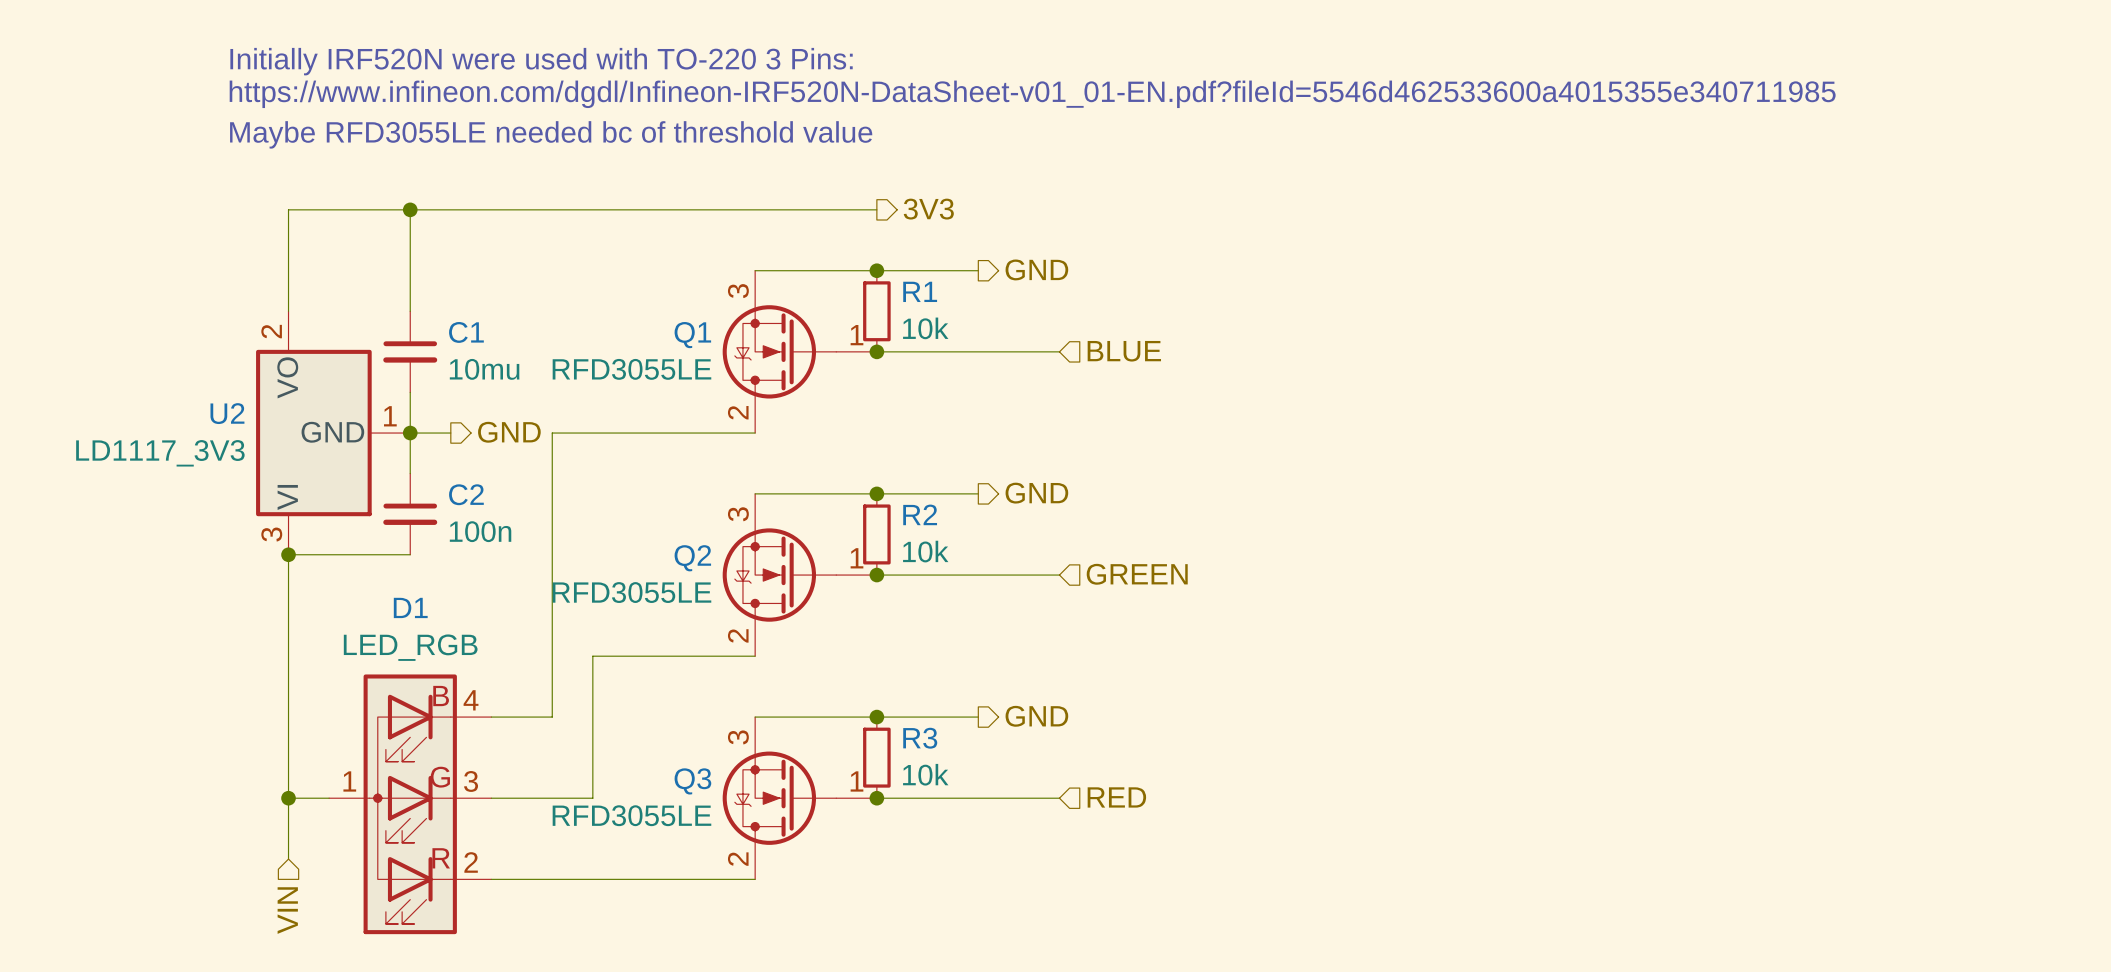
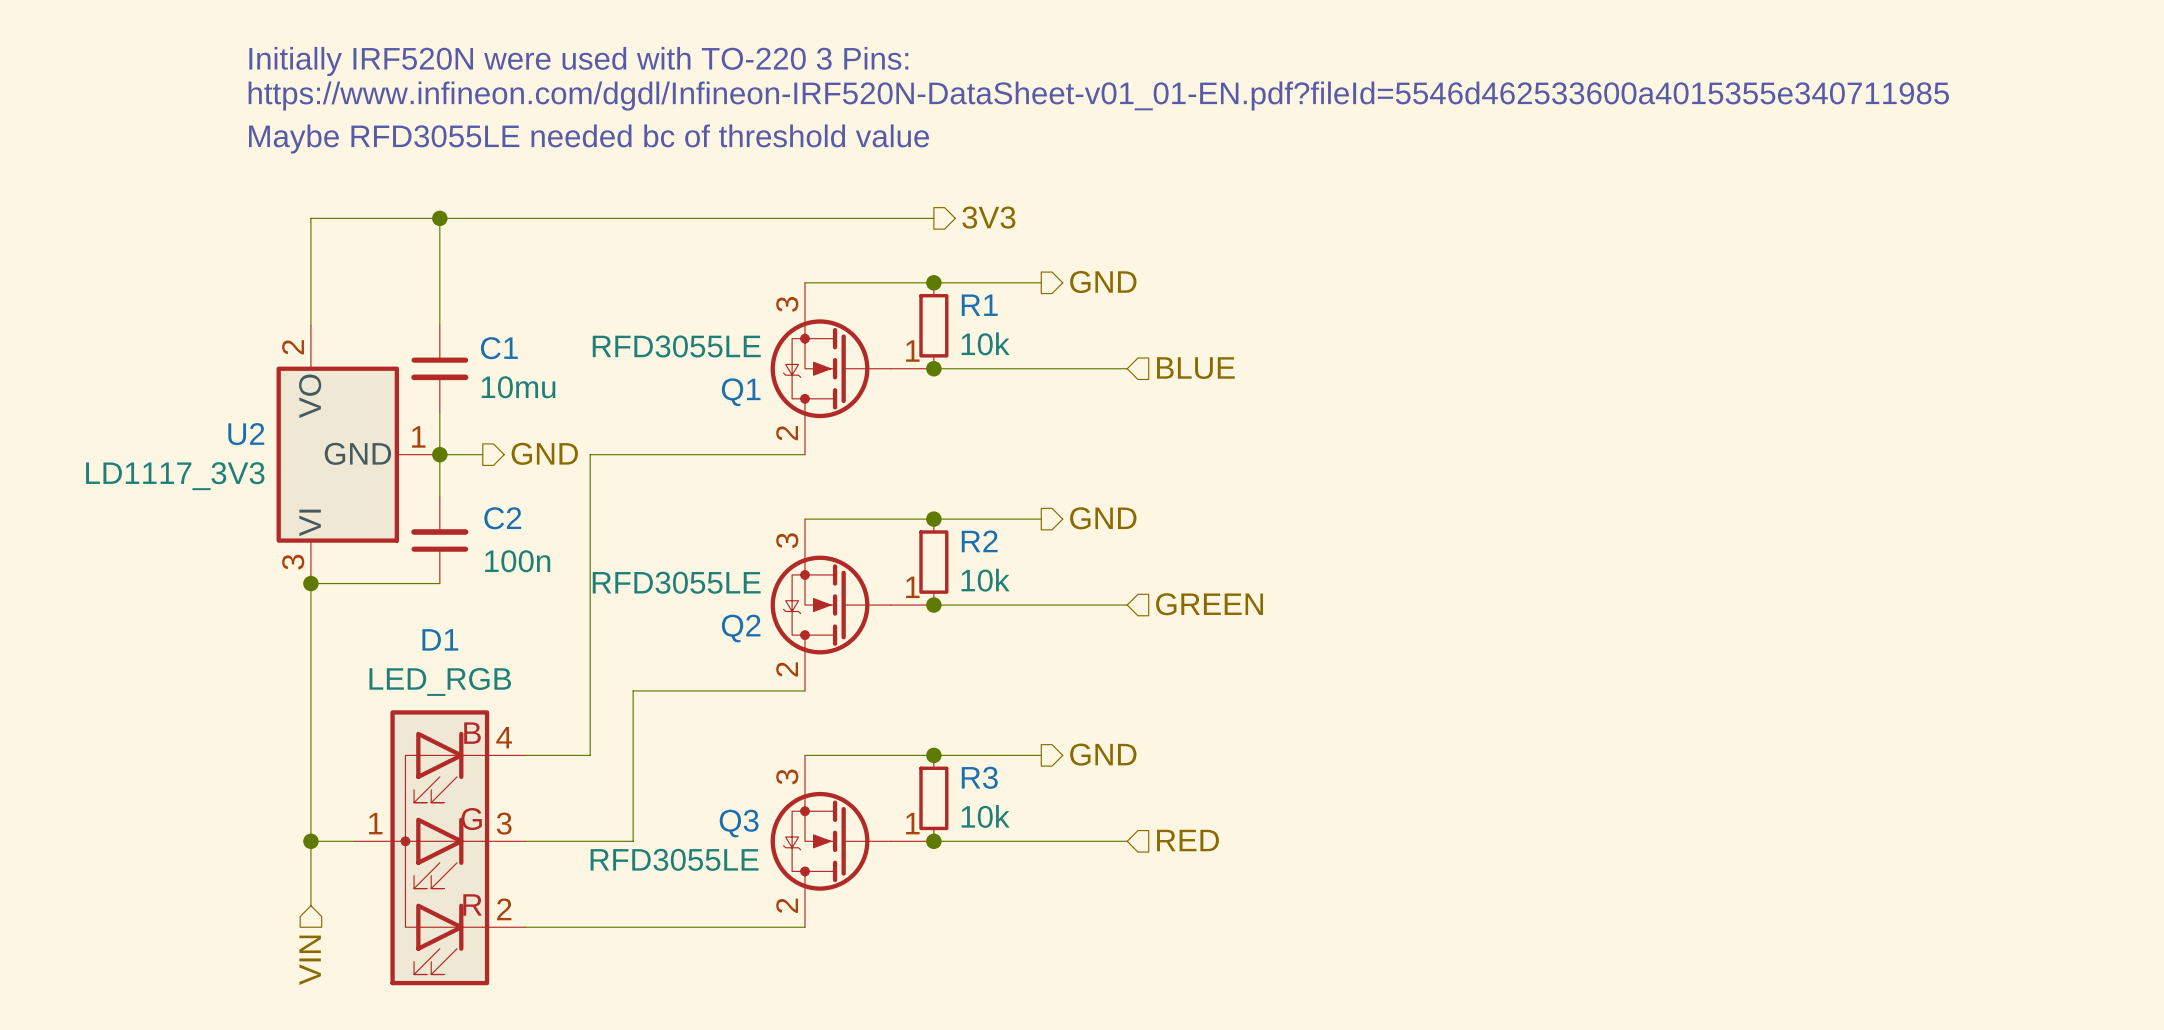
Q1 name position: Q1 (692, 335) -> Q1 (741, 392)
Q1 value position: RFD3055LE (631, 369) -> RFD3055LE (676, 346)
C2 rotation: 0° (410, 514) -> 180° (439, 540)
Q2 name position: Q2 (692, 558) -> Q2 (741, 628)
Q2 value position: RFD3055LE (631, 592) -> RFD3055LE (676, 582)

